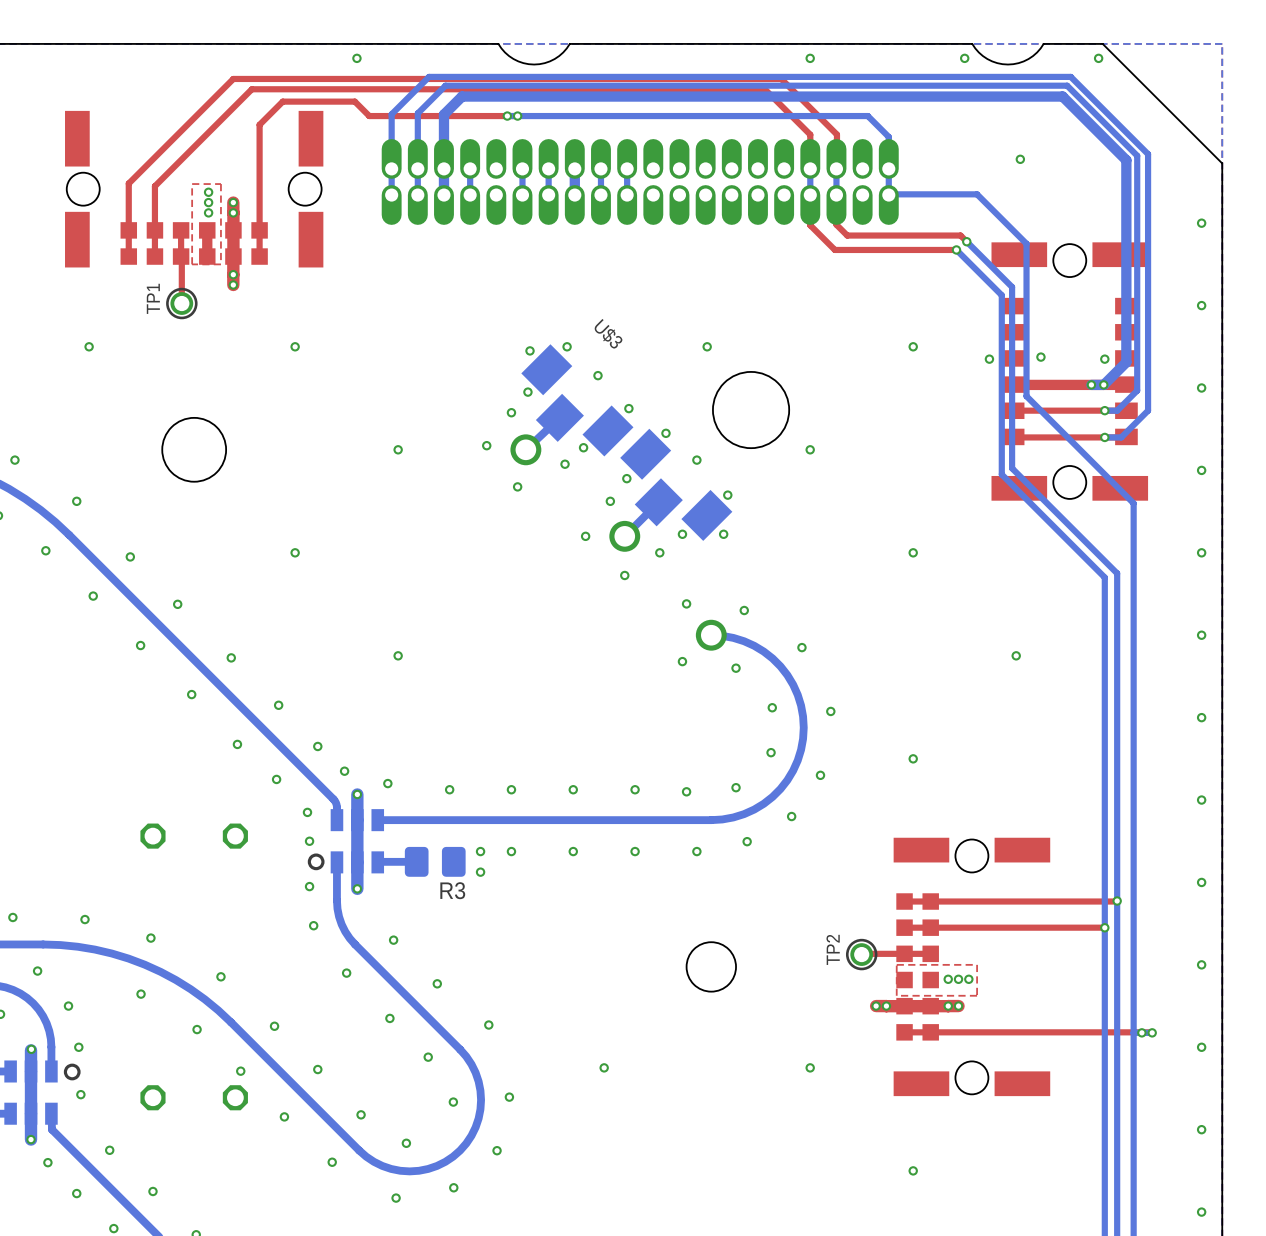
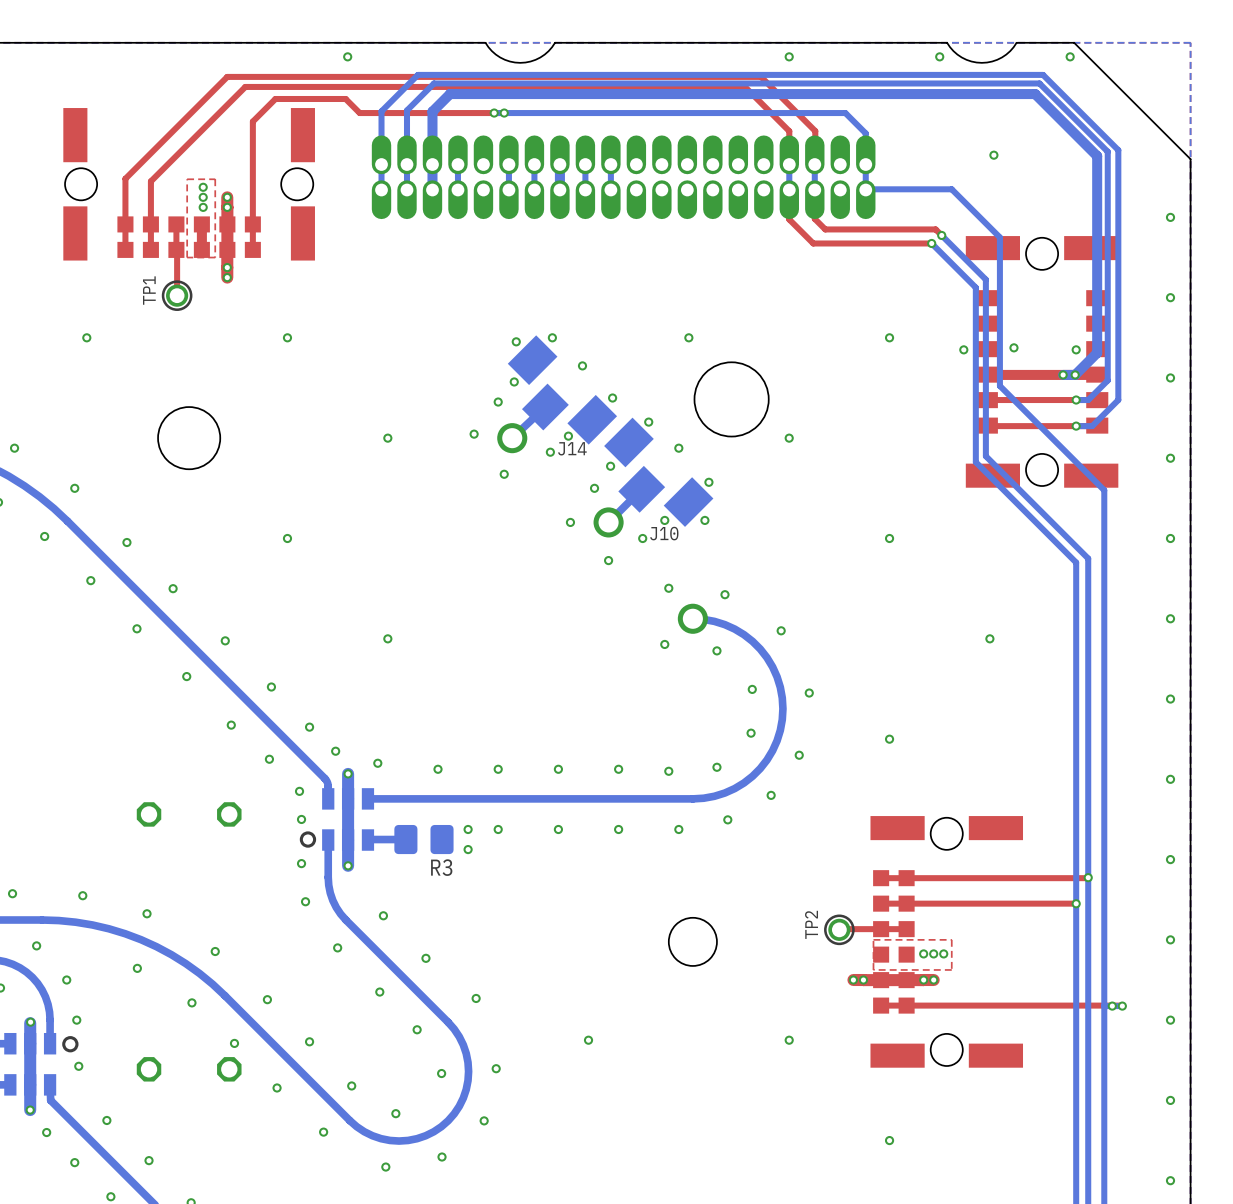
U$3 name: U$3 (608, 333) -> J14 (572, 448)
J10 name: none -> J10 (664, 533)

